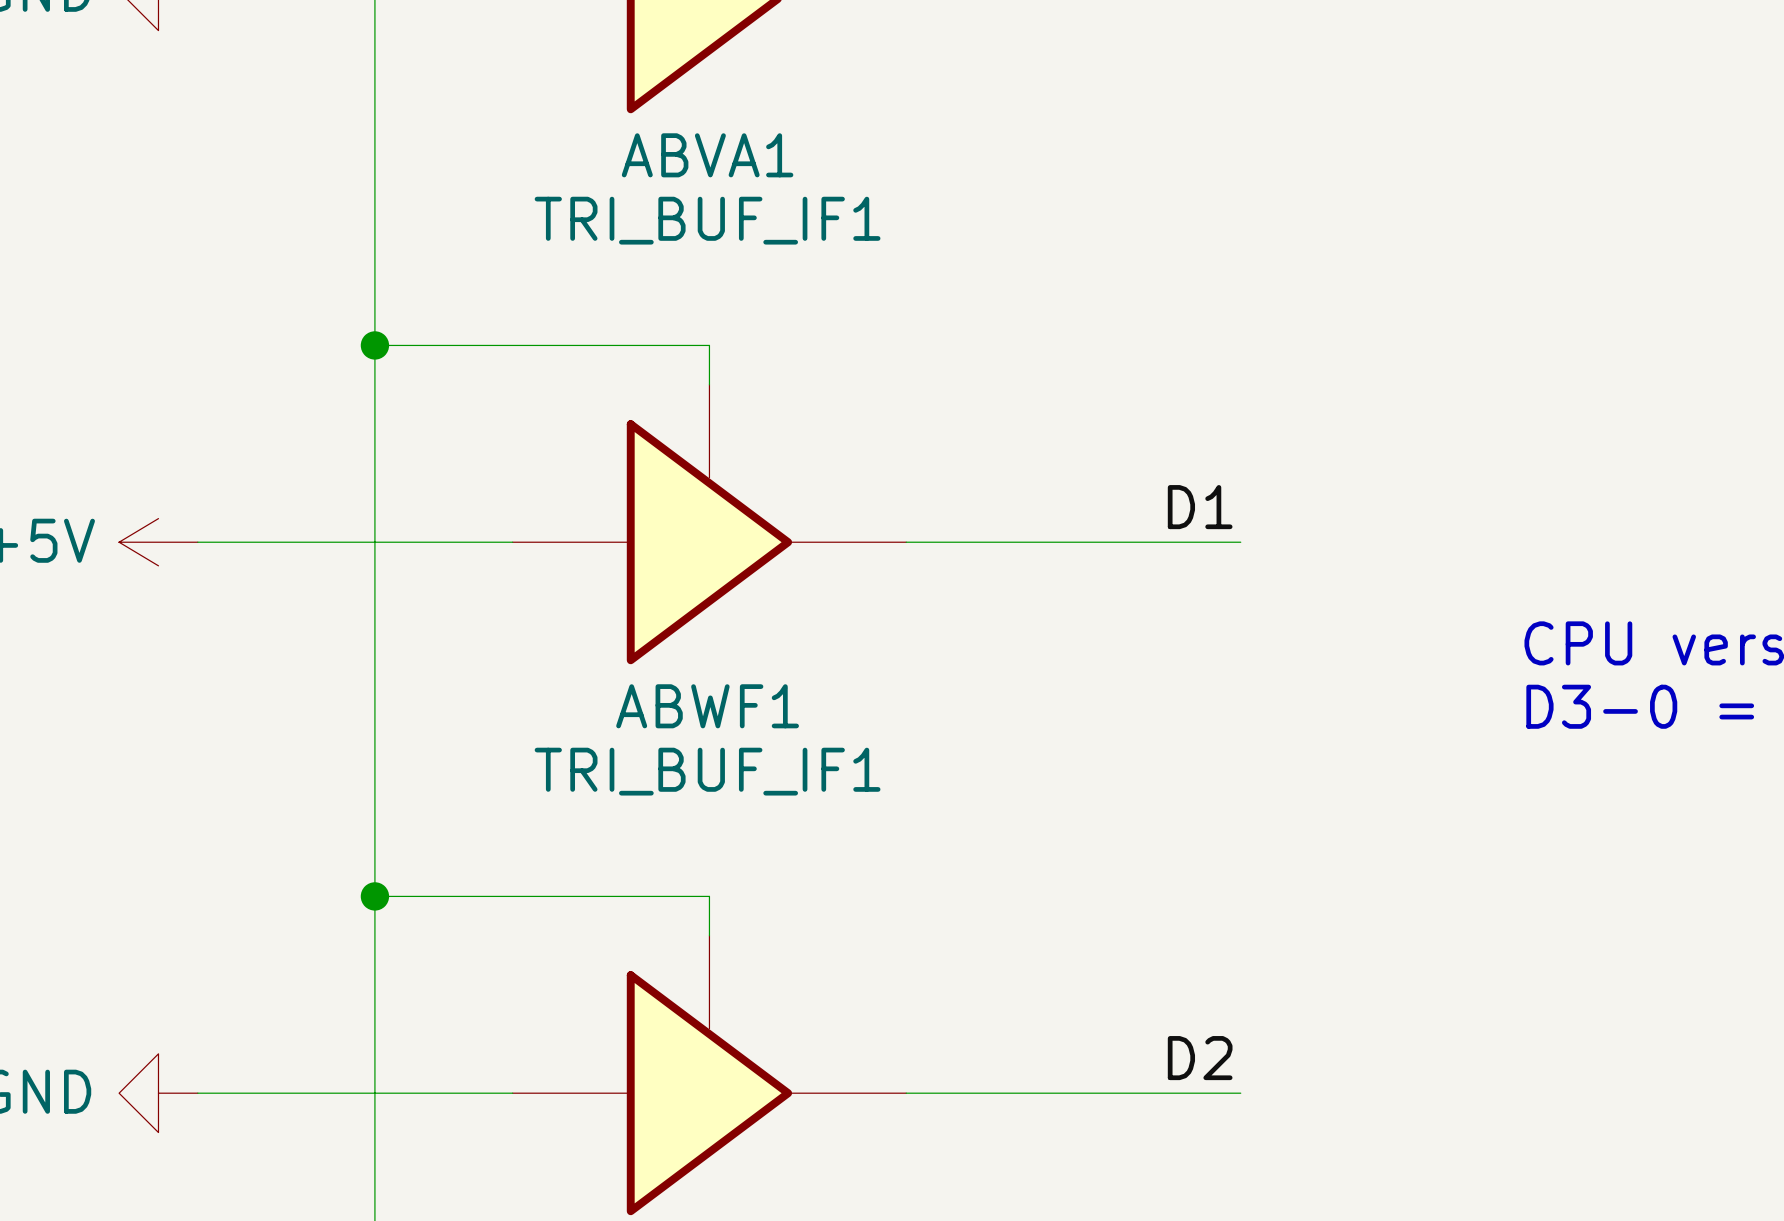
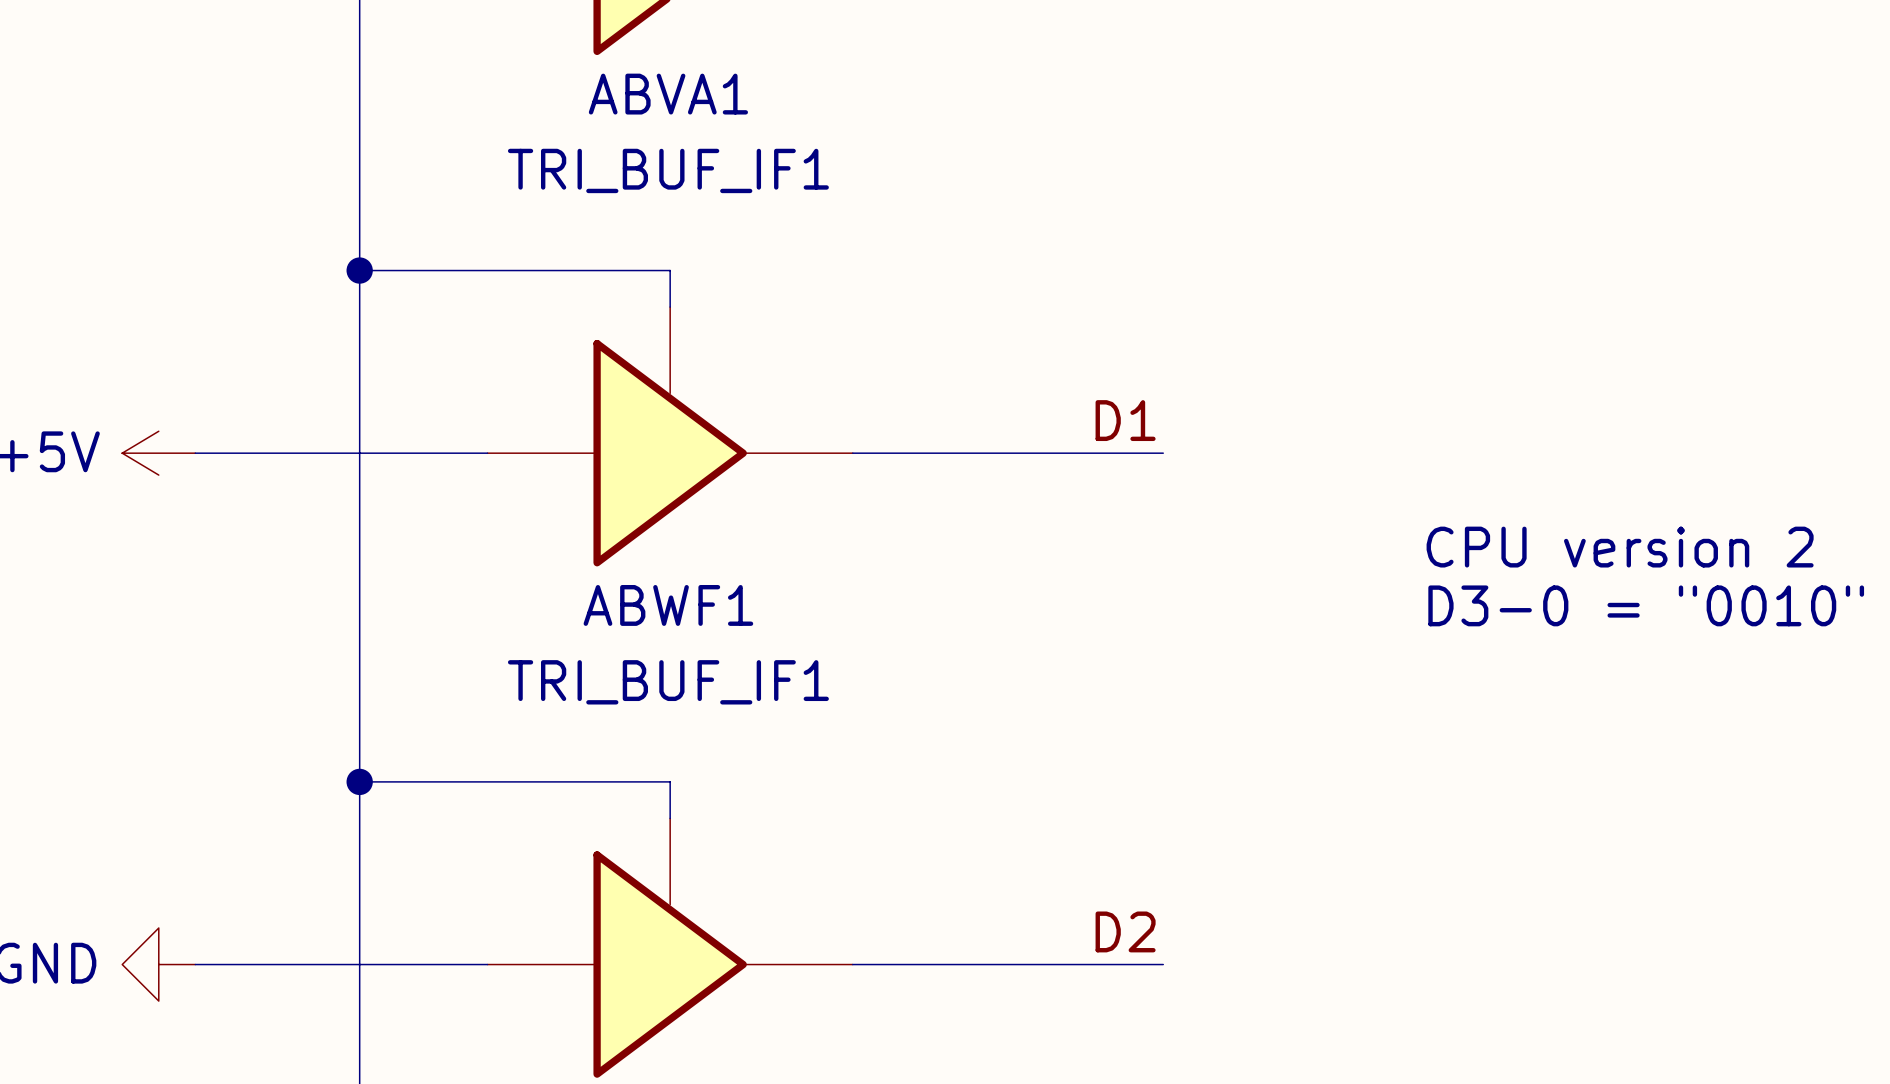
ABVA1 value position: TRI_BUF_IF1 (707, 220) -> TRI_BUF_IF1 (668, 170)
ABWF1 value position: TRI_BUF_IF1 (707, 771) -> TRI_BUF_IF1 (668, 682)

